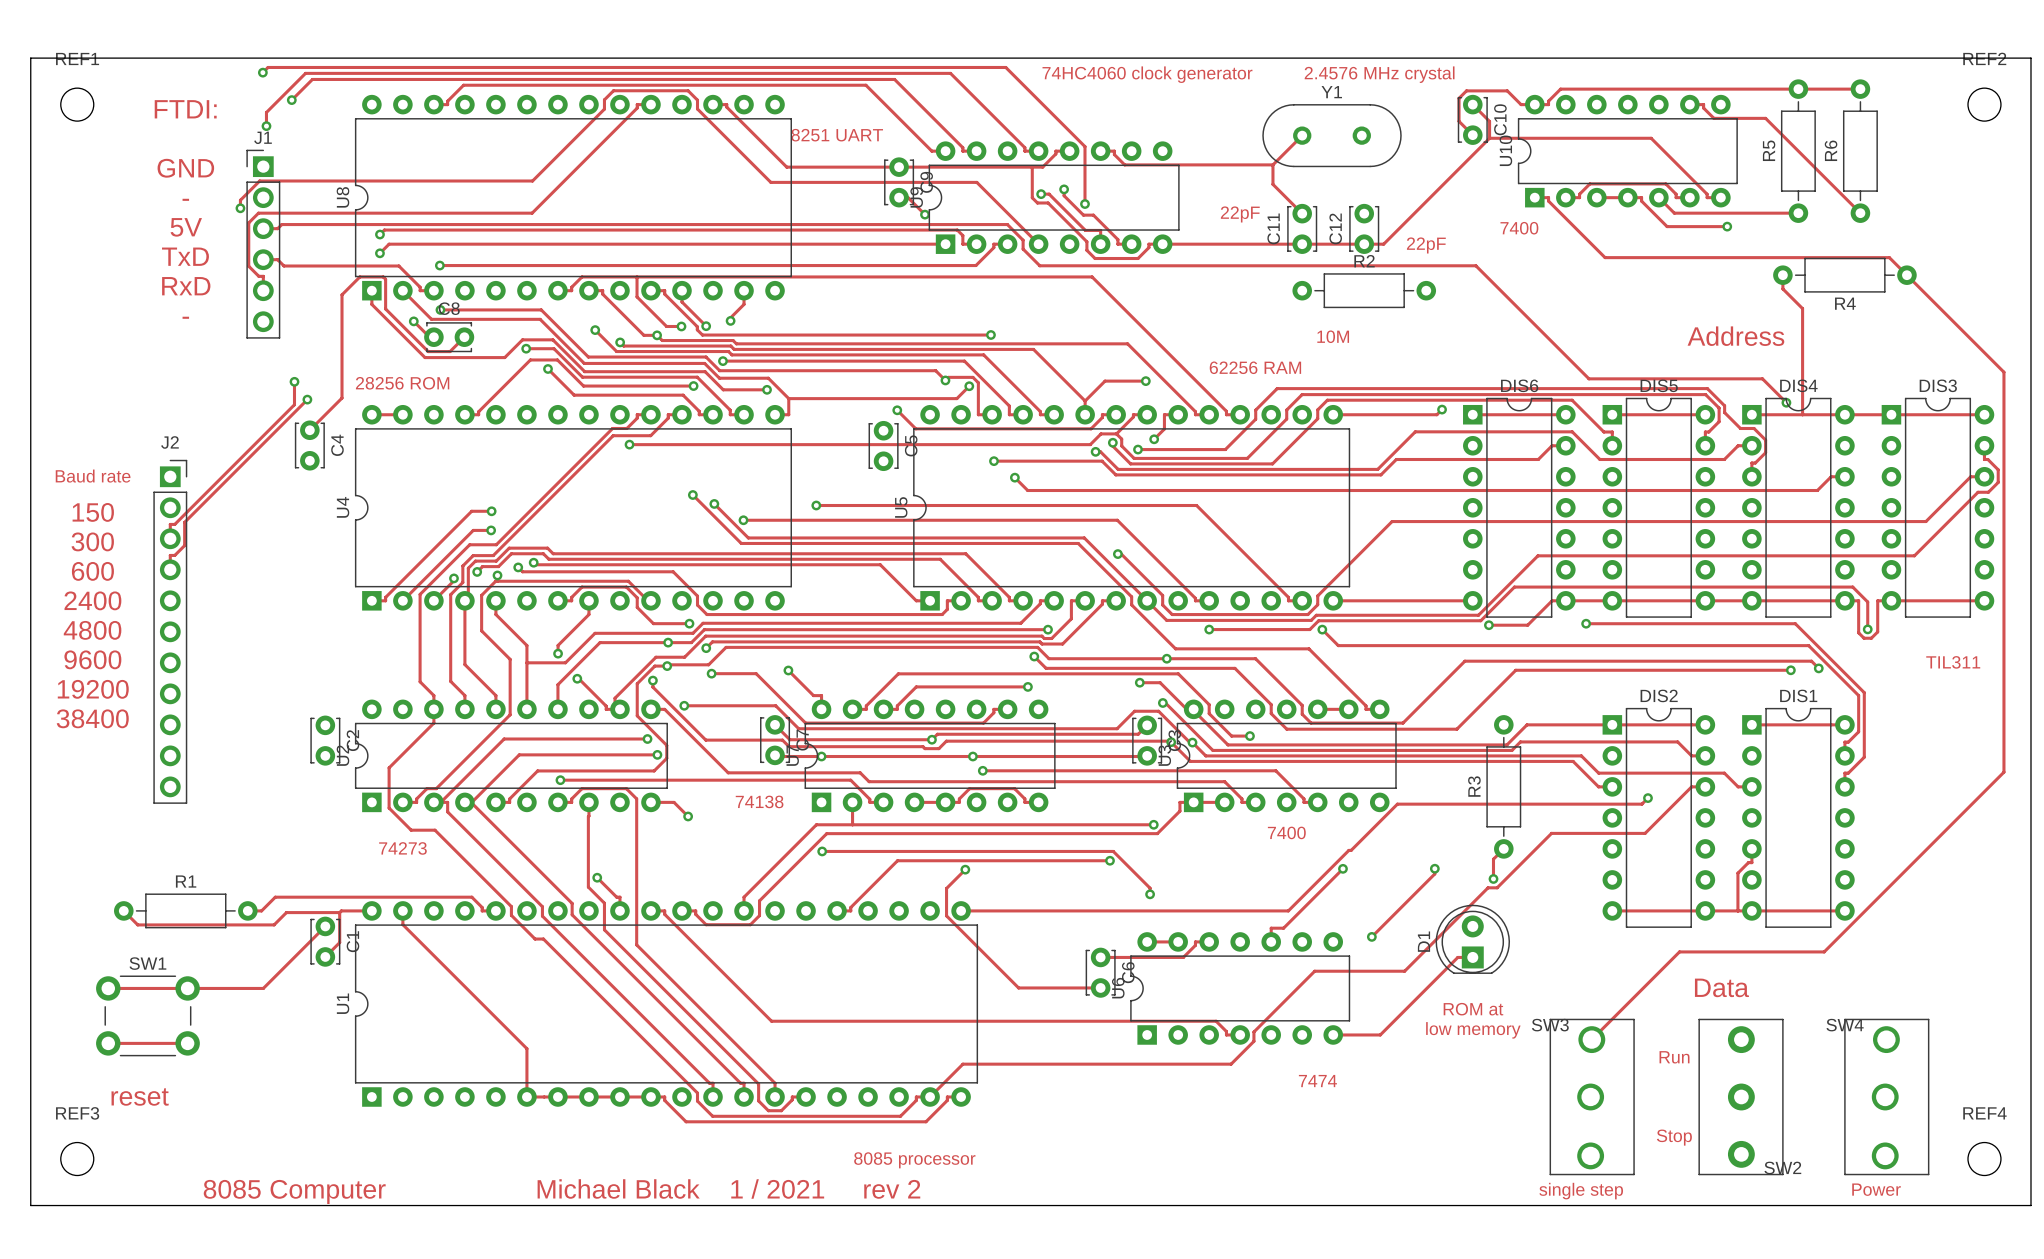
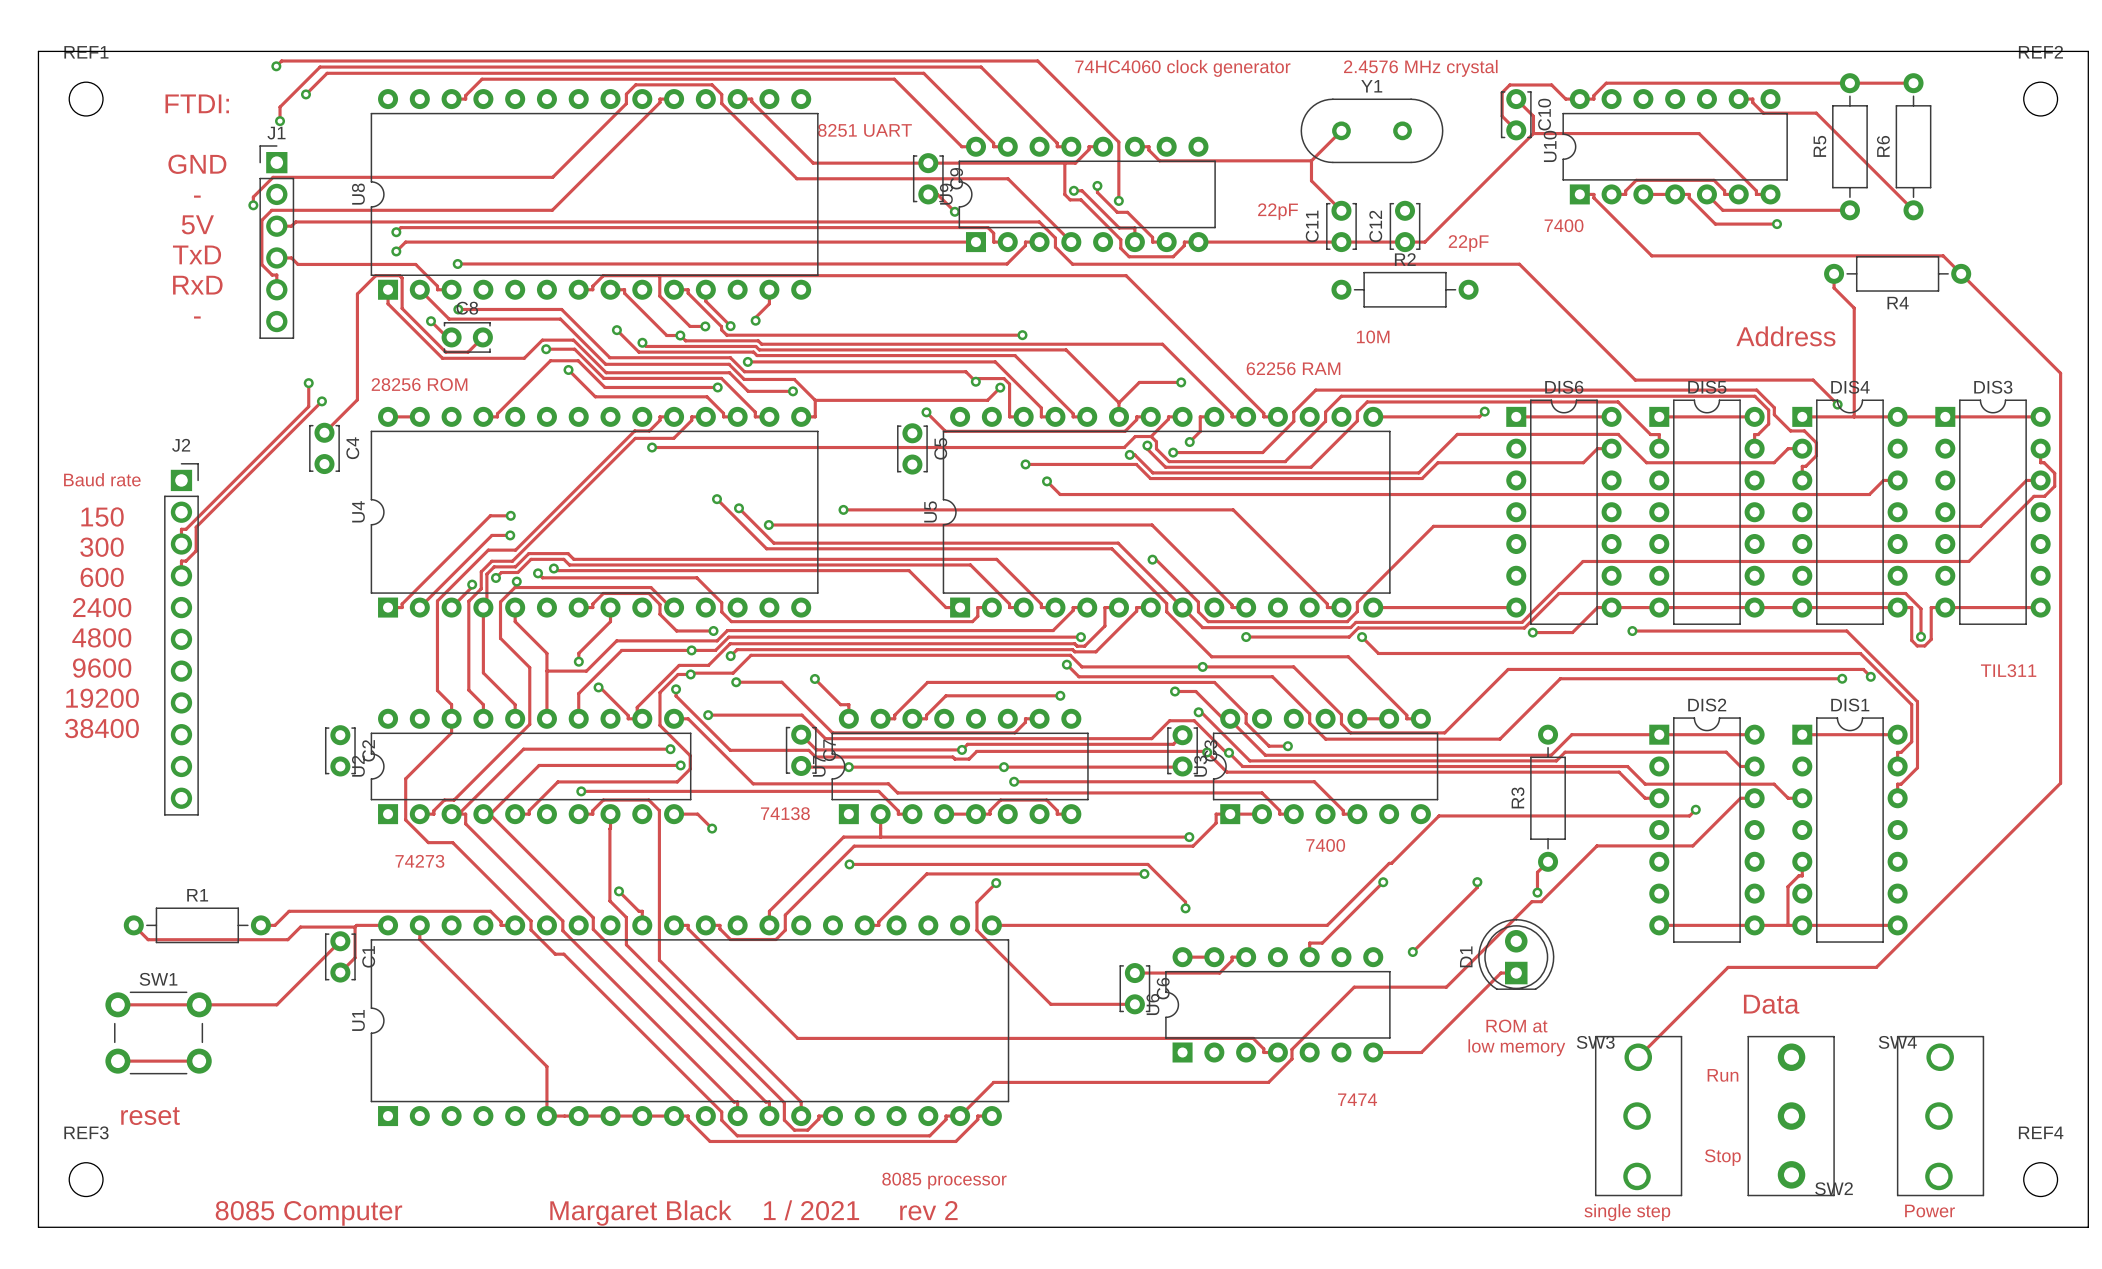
text: Michael Black 1 / 2021 rev 2 (728, 1188) -> Margaret Black 1 / 2021 rev 2 (753, 1213)

